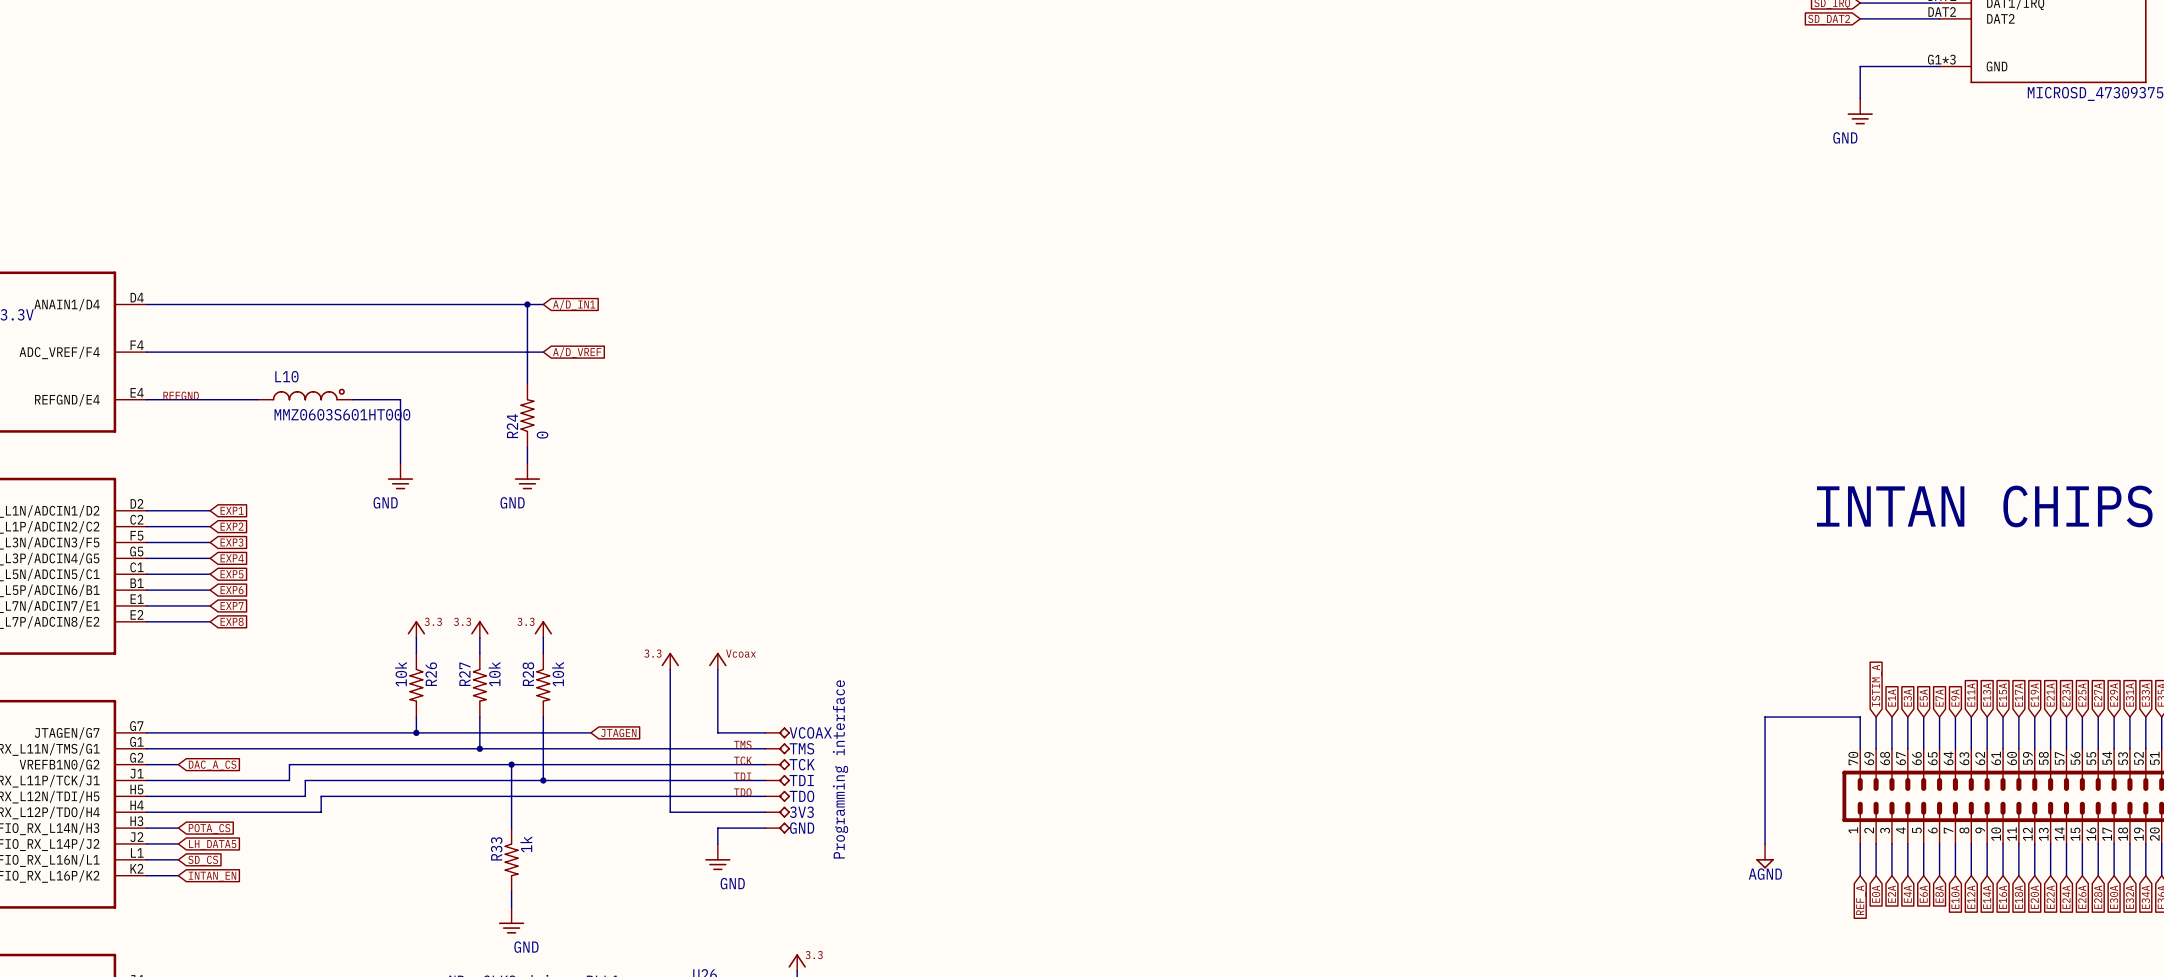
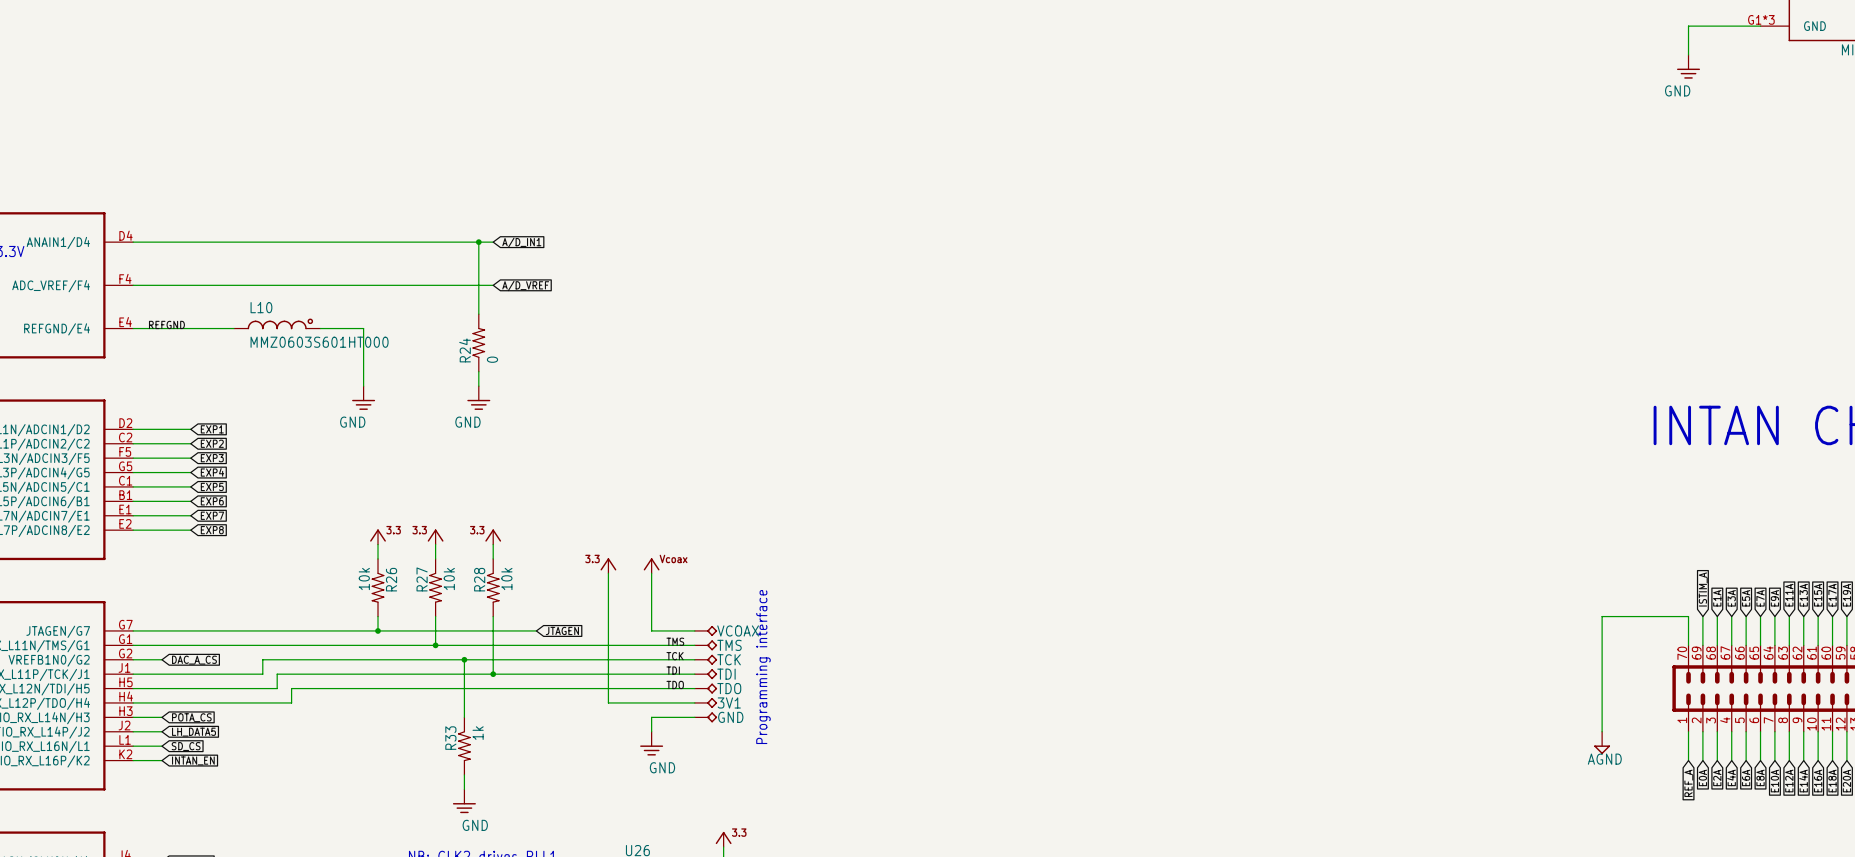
3V3 name: 3V3 (801, 812) -> 3V1 (729, 702)

